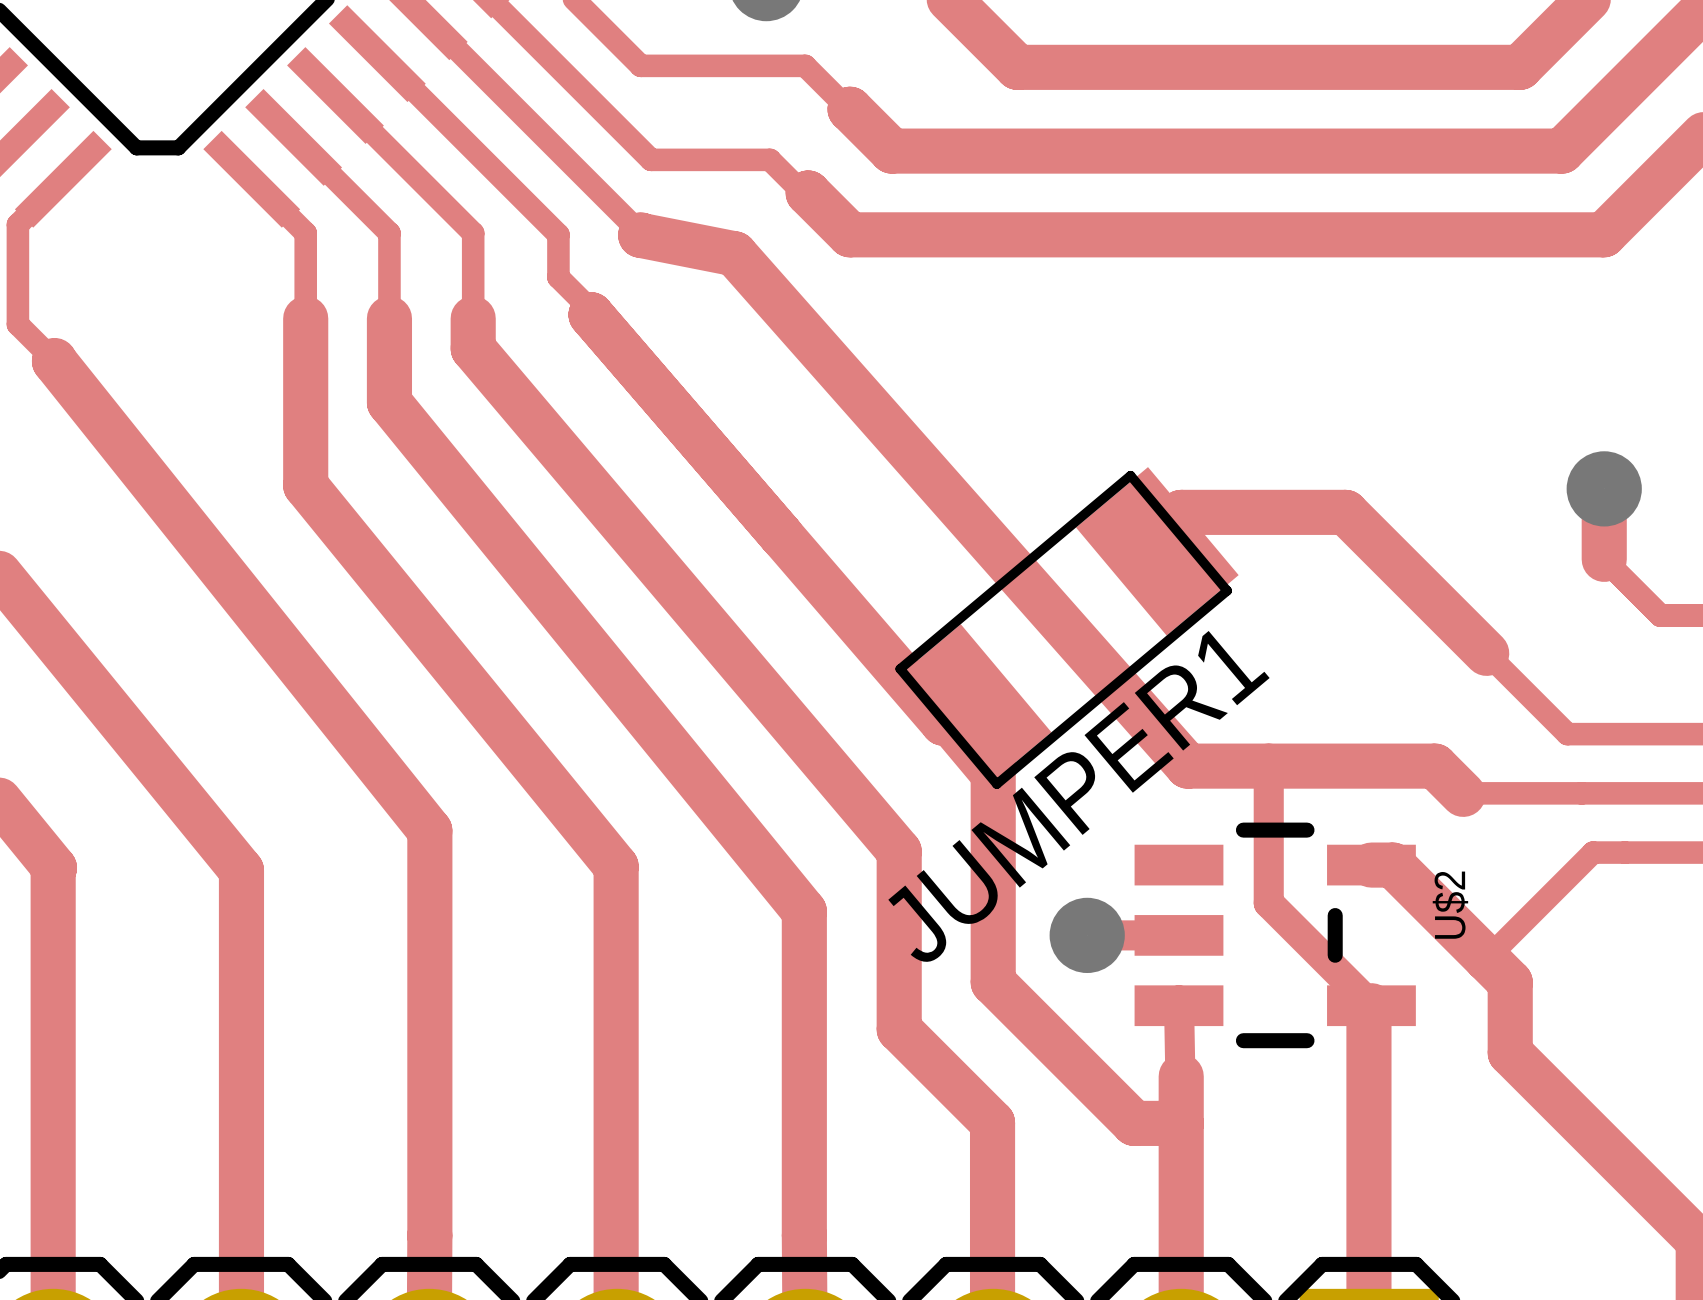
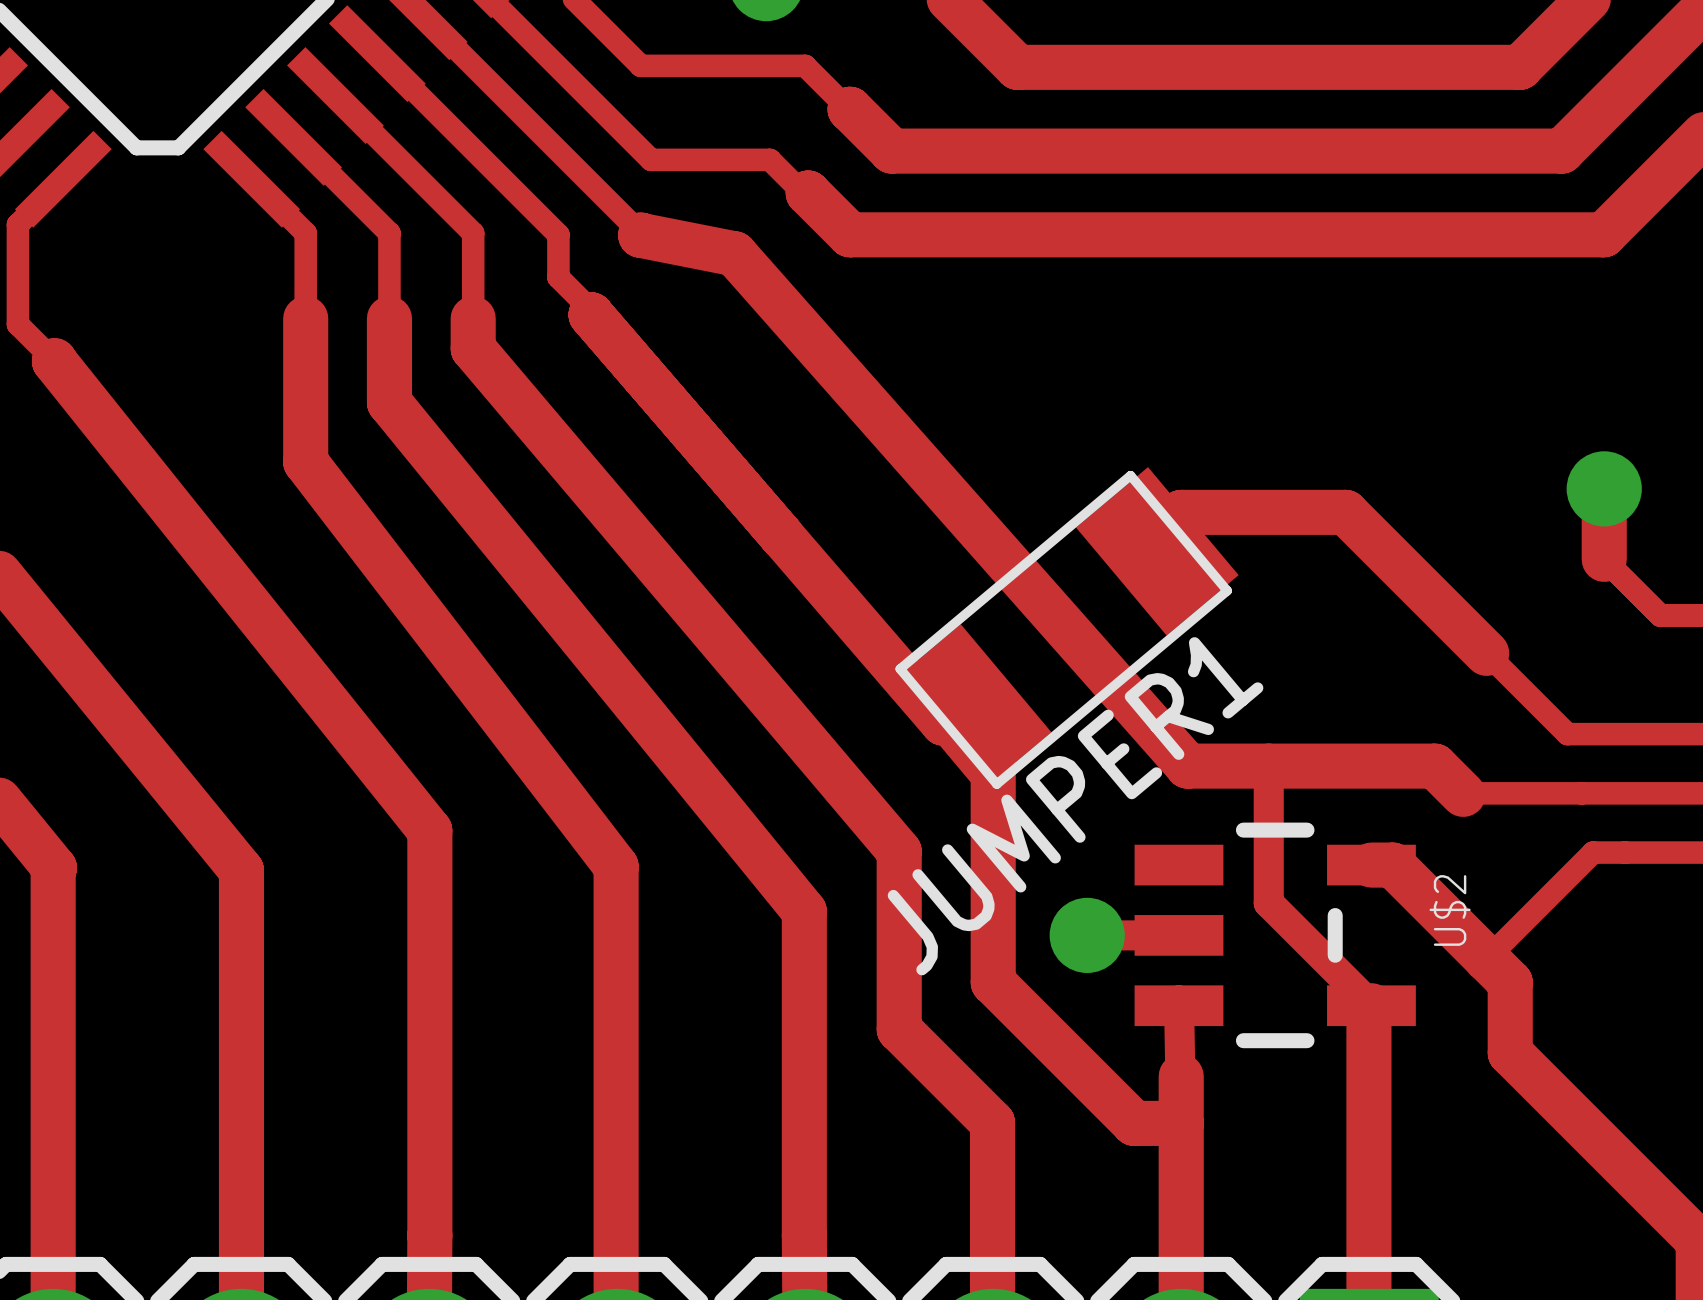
track: (305, 462) (305, 485) (616, 866) -> (305, 462) (616, 866)

